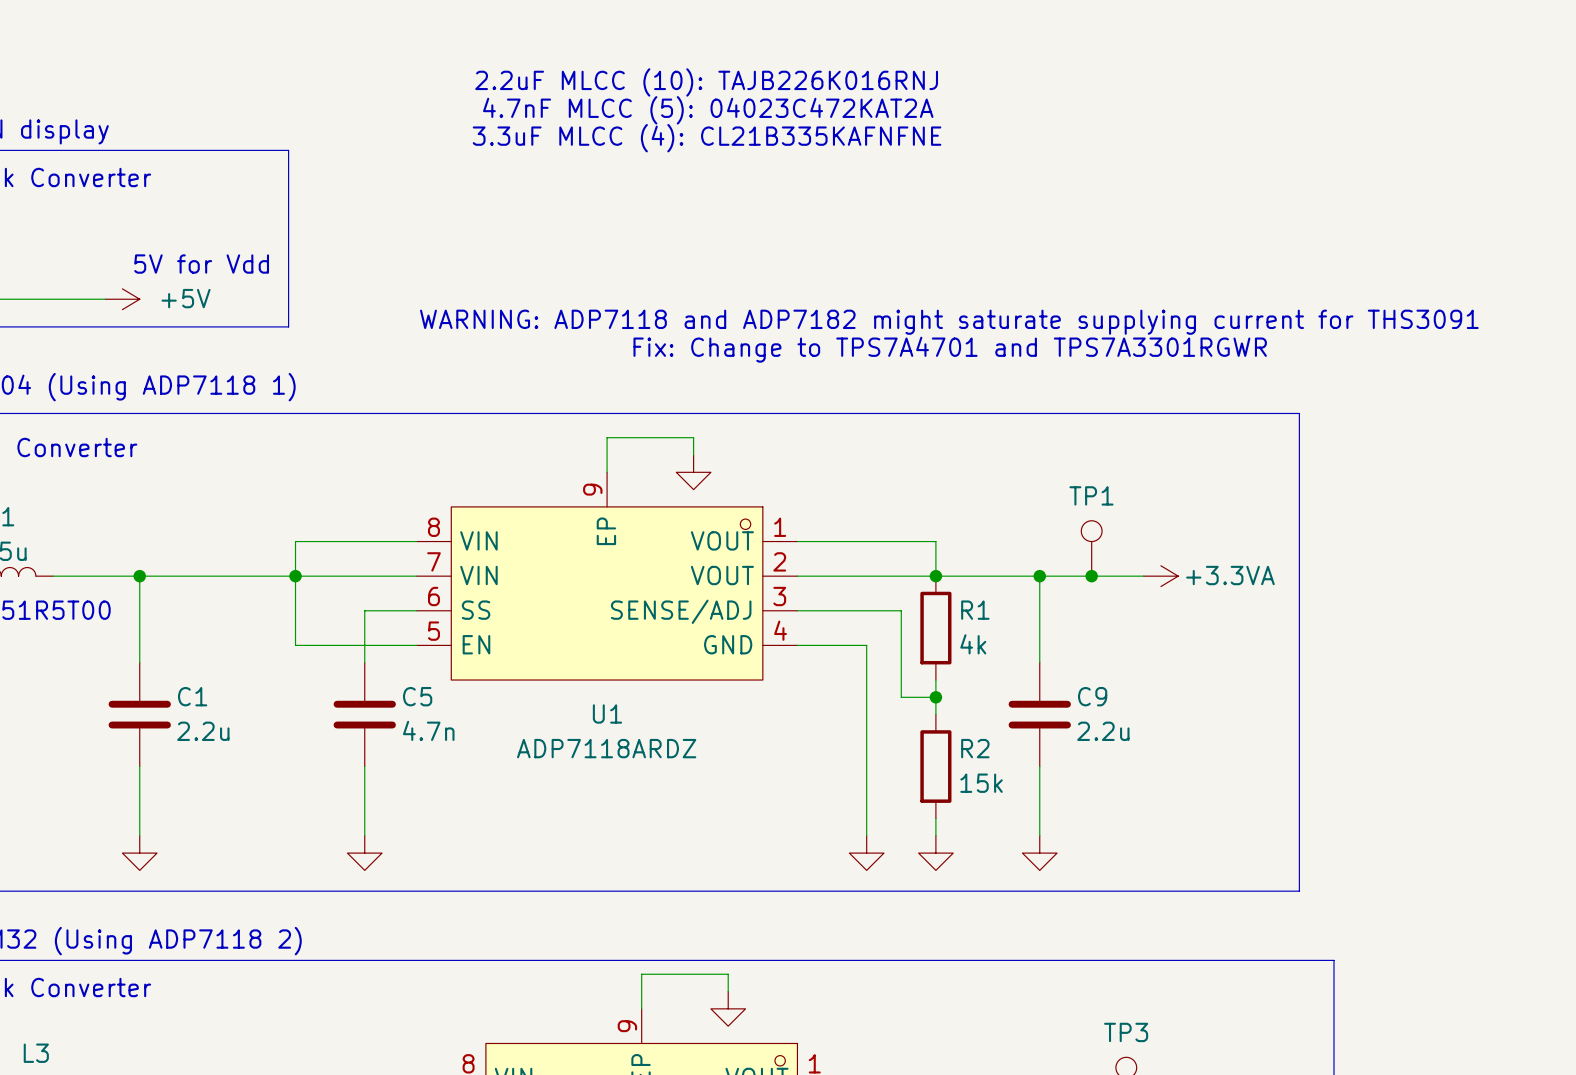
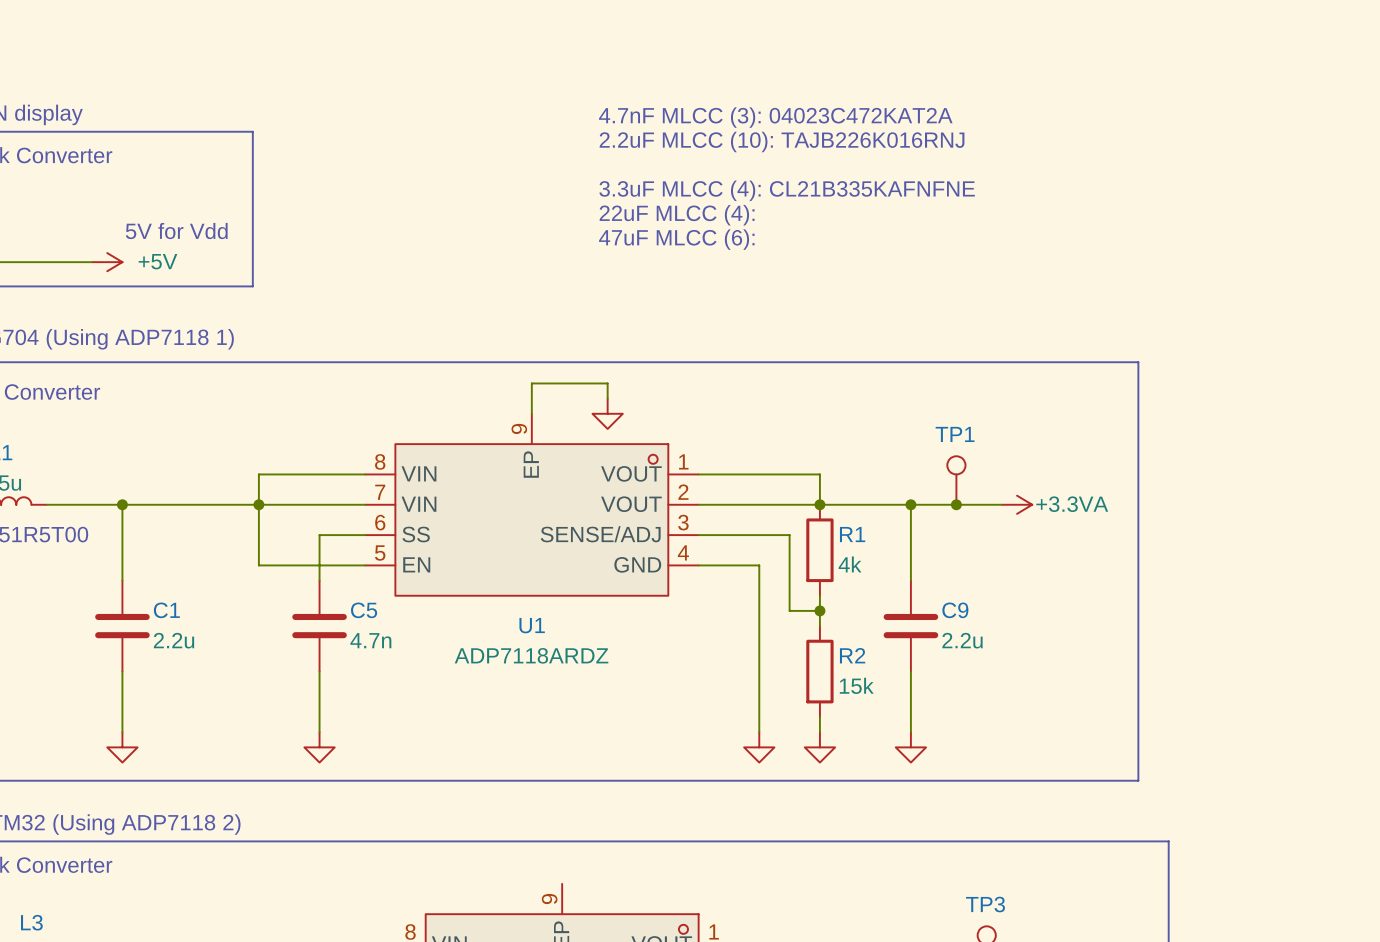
text position: 2.2uF MLCC (10): TAJB226K016RNJ (706, 82) -> 2.2uF MLCC (10): TAJB226K016RNJ (782, 141)
text: 4.7nF MLCC (5): 04023C472KAT2A (708, 110) -> 4.7nF MLCC (3): 04023C472KAT2A (775, 117)
text position: 3.3uF MLCC (4): CL21B335KAFNFNE (707, 138) -> 3.3uF MLCC (4): CL21B335KAFNFNE (787, 190)
text: none -> 22uF MLCC (4): (677, 215)
text: none -> 47uF MLCC (6): (676, 239)
text: WARNING: ADP7118 and ADP7182 might saturate supplying current for THS3091 (949, 322) -> none
text: Fix: Change to TPS7A4701 and TPS7A3301RGWR (950, 349) -> none
wire: (728, 991) (728, 974) (641, 974) (641, 1008) -> none
power symbol: (728, 1008) -> none

